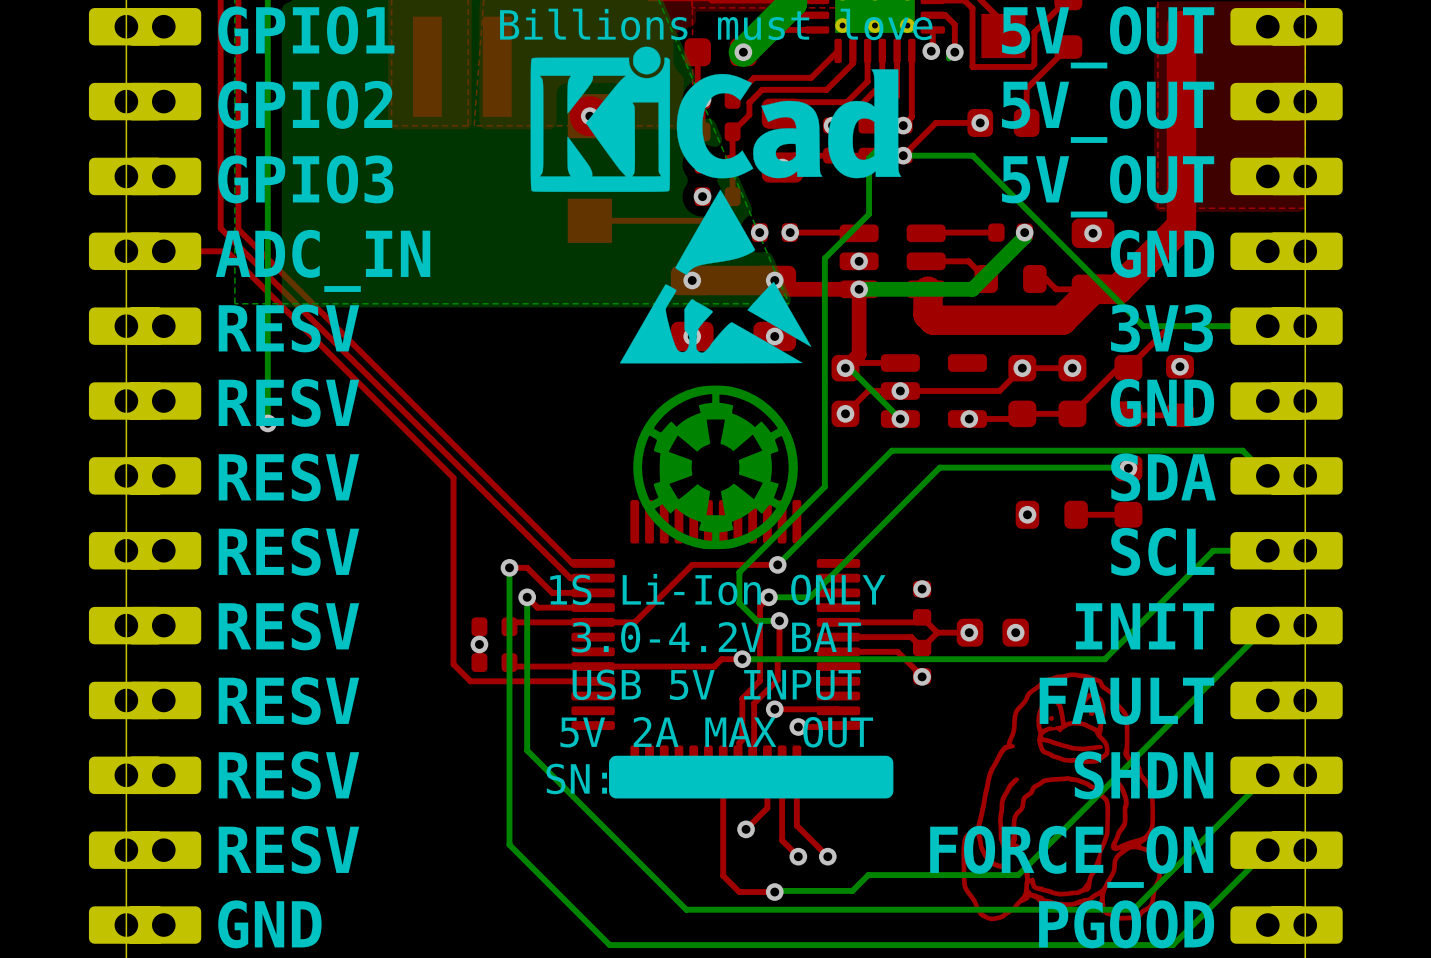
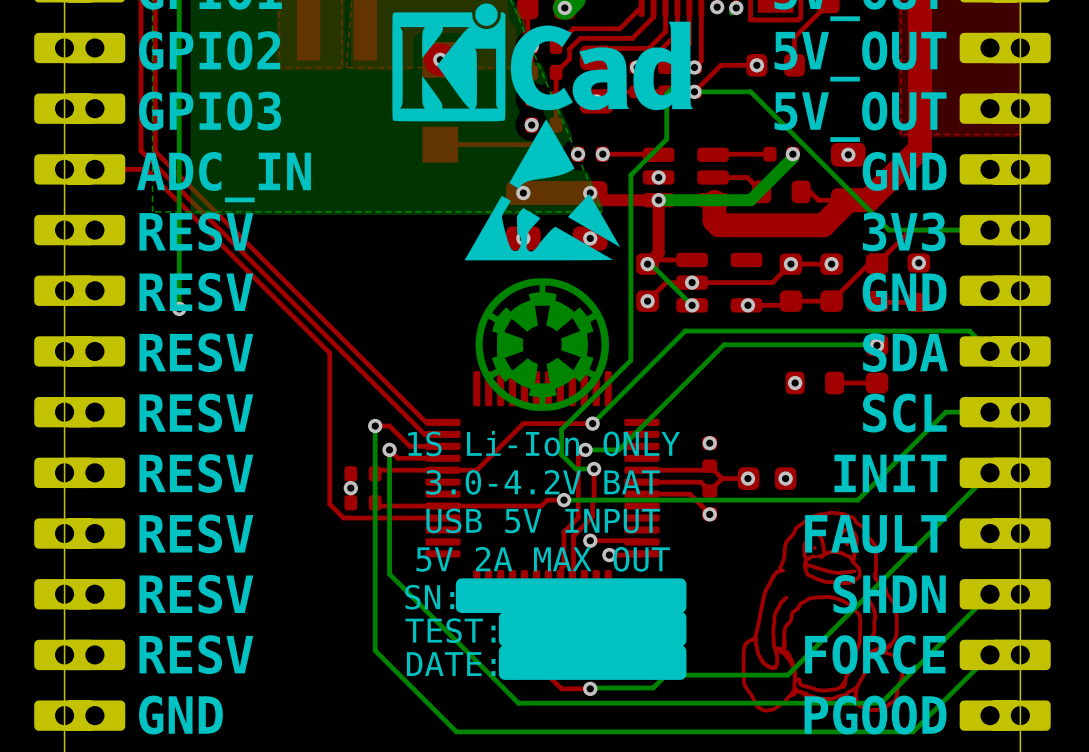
drawing: none -> [498, 611, 687, 680]
text: none -> TEST: (450, 630)
text: FORCE_ON (1071, 856) -> FORCE (875, 654)
text: none -> DATE: (451, 664)

